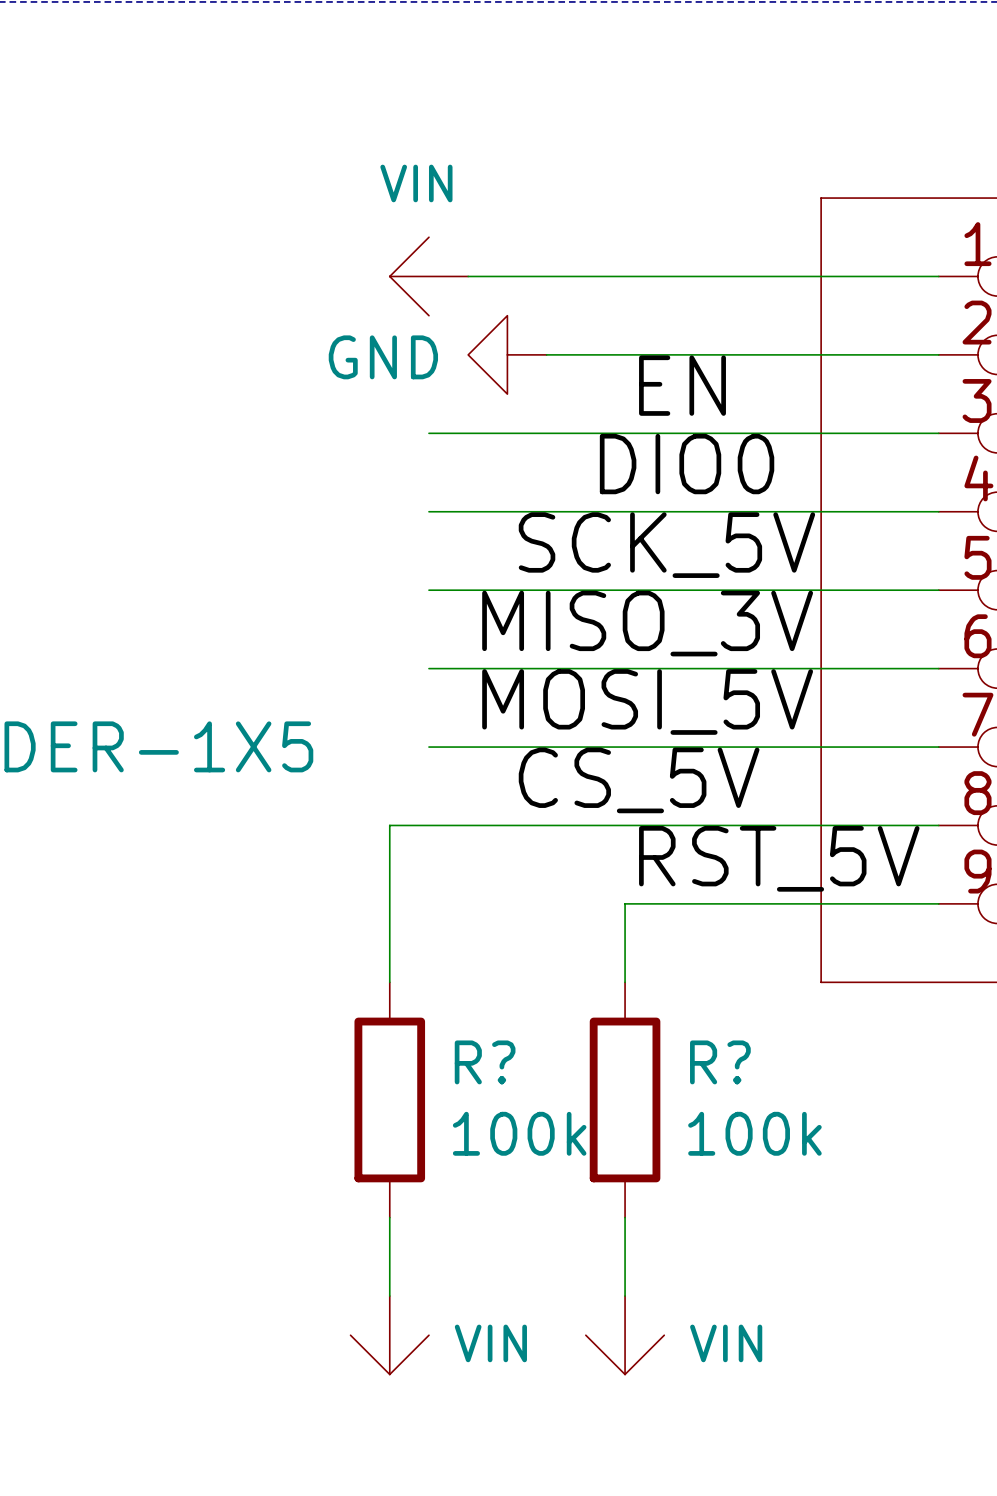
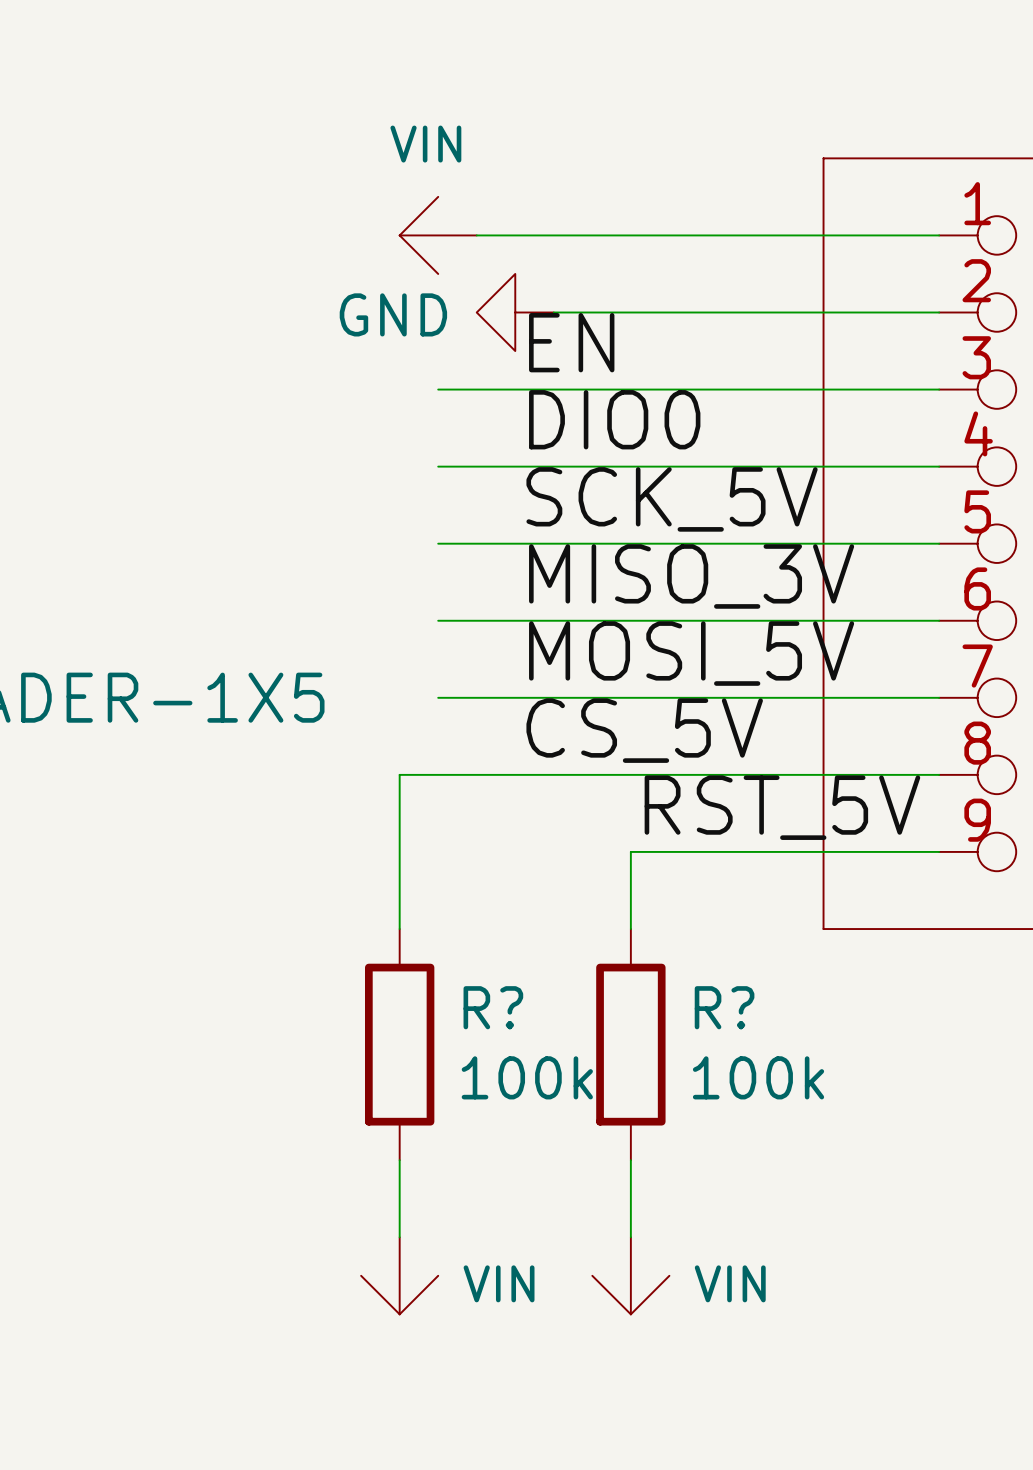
label position: EN (682, 385) -> EN (571, 342)
label position: DIO0 (687, 464) -> DIO0 (614, 419)
label position: MISO_3V (647, 623) -> MISO_3V (691, 576)
label position: MOSI_5V (647, 701) -> MOSI_5V (691, 653)

